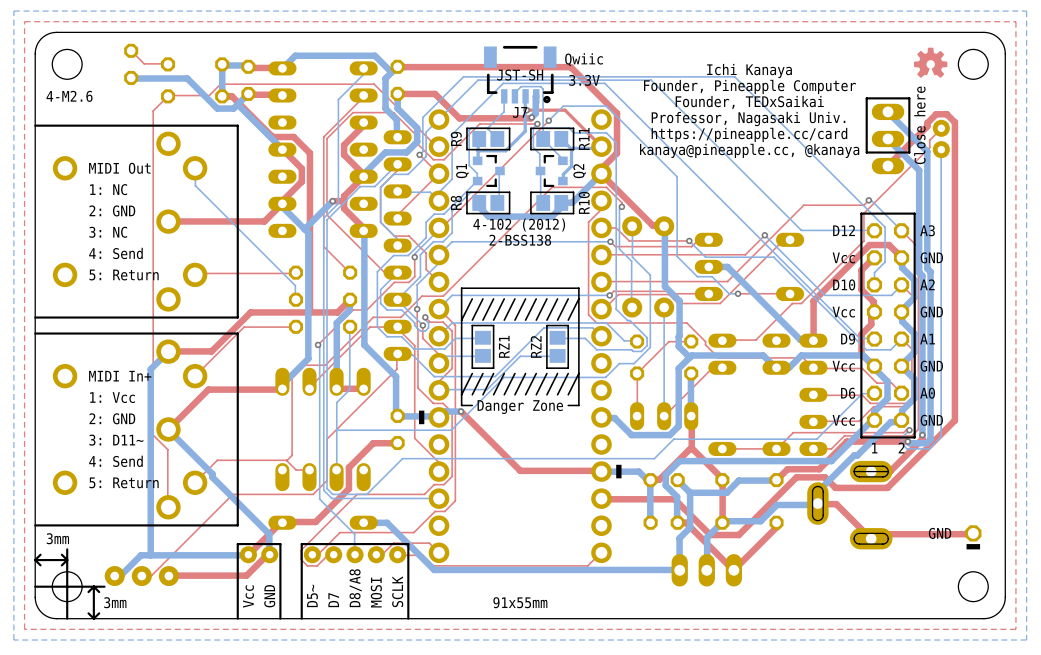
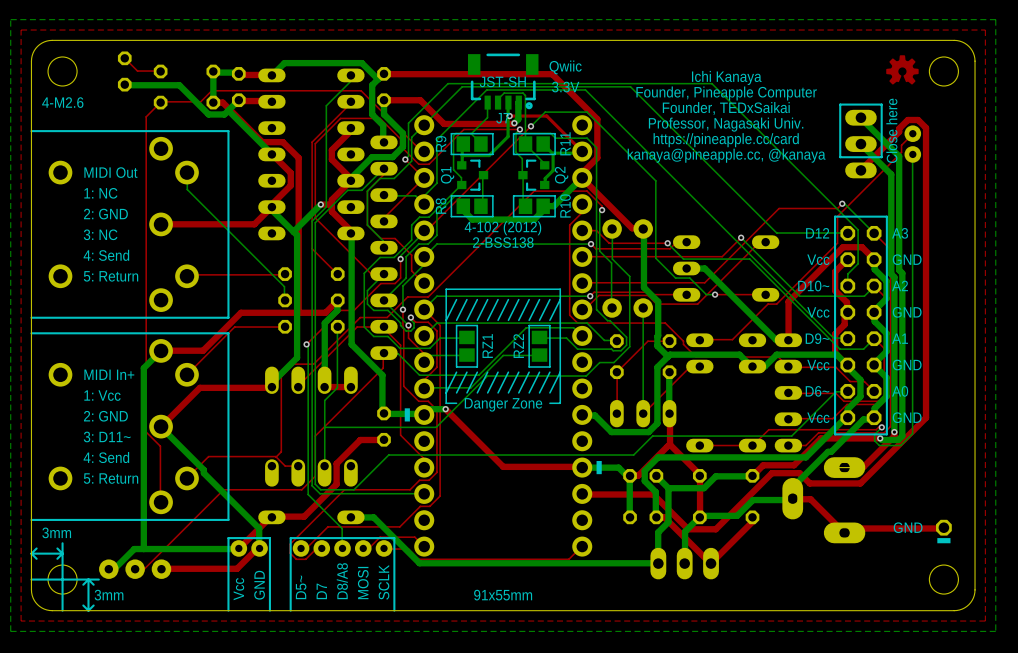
text: D10 (844, 284) -> D10~ (813, 286)
text: D9 (848, 339) -> D9~ (817, 338)
text: D6 (848, 393) -> D6~ (817, 391)
text: 1 (874, 448) -> none
text: 2 (901, 448) -> none

